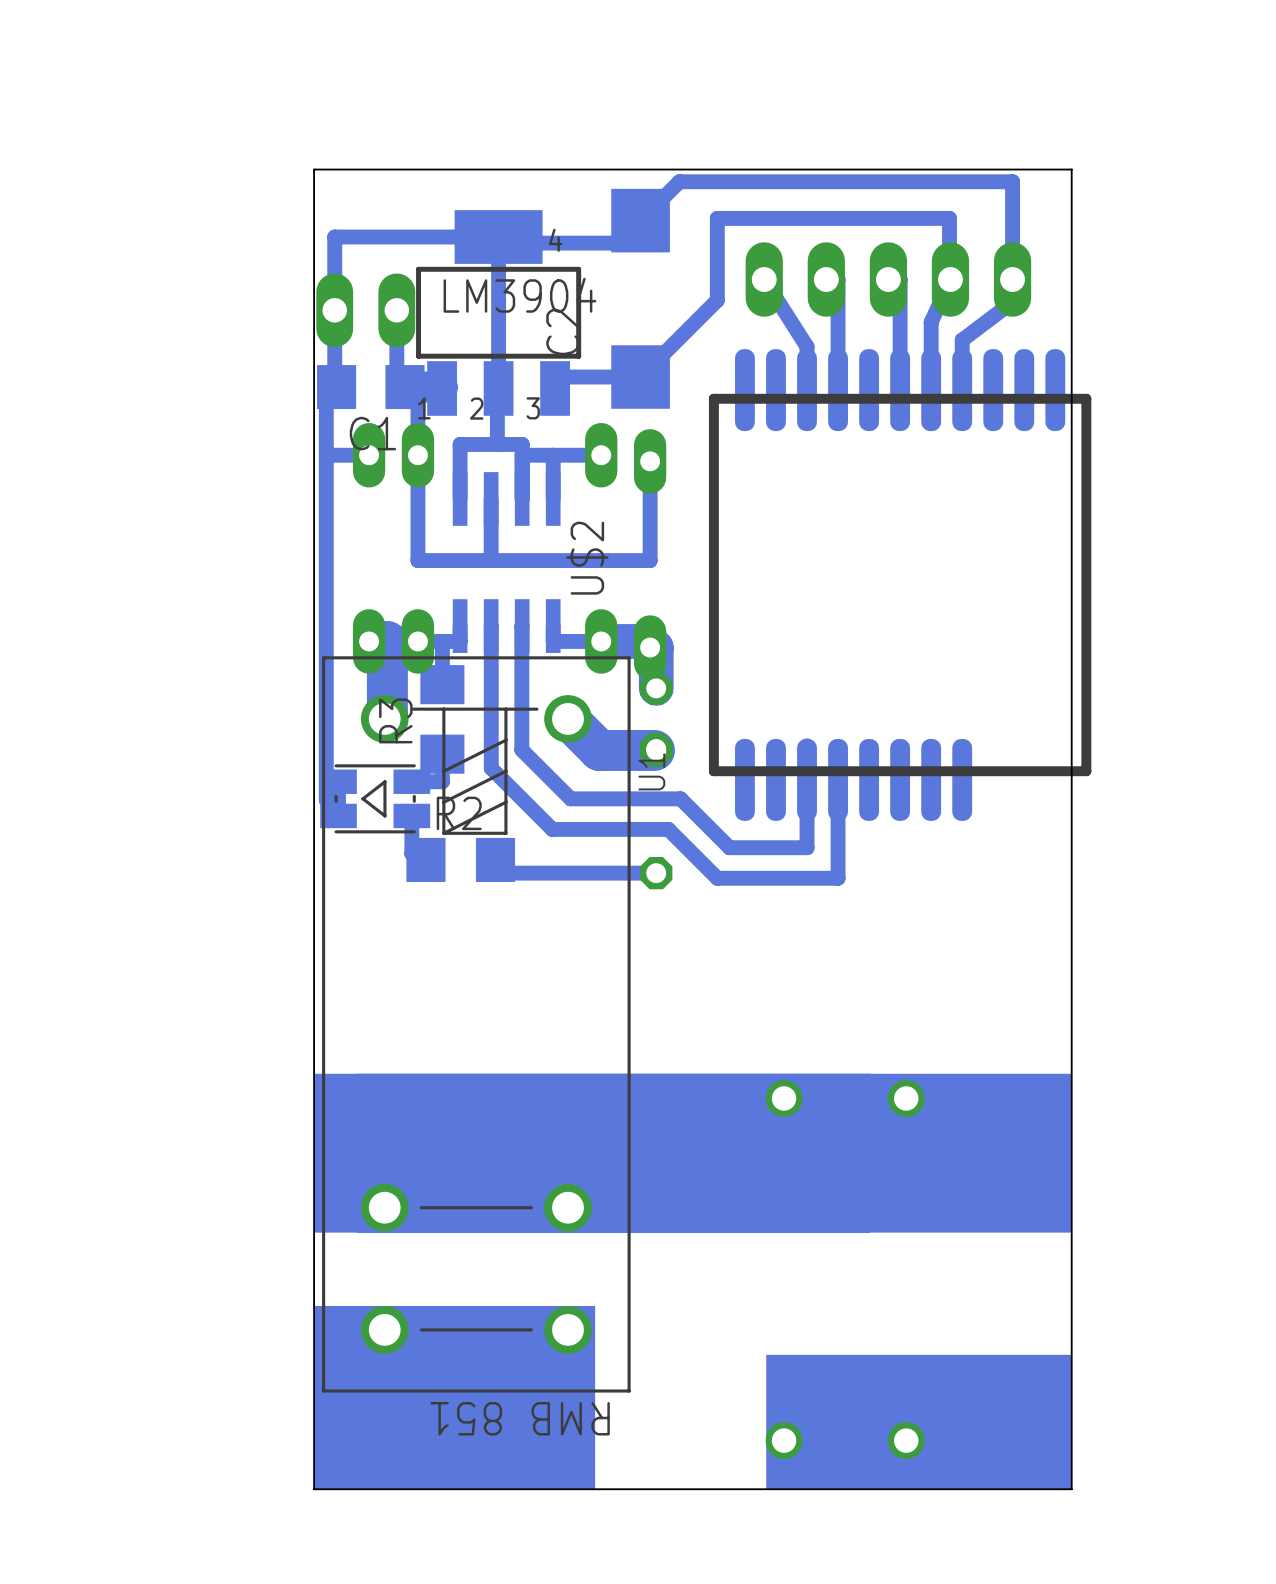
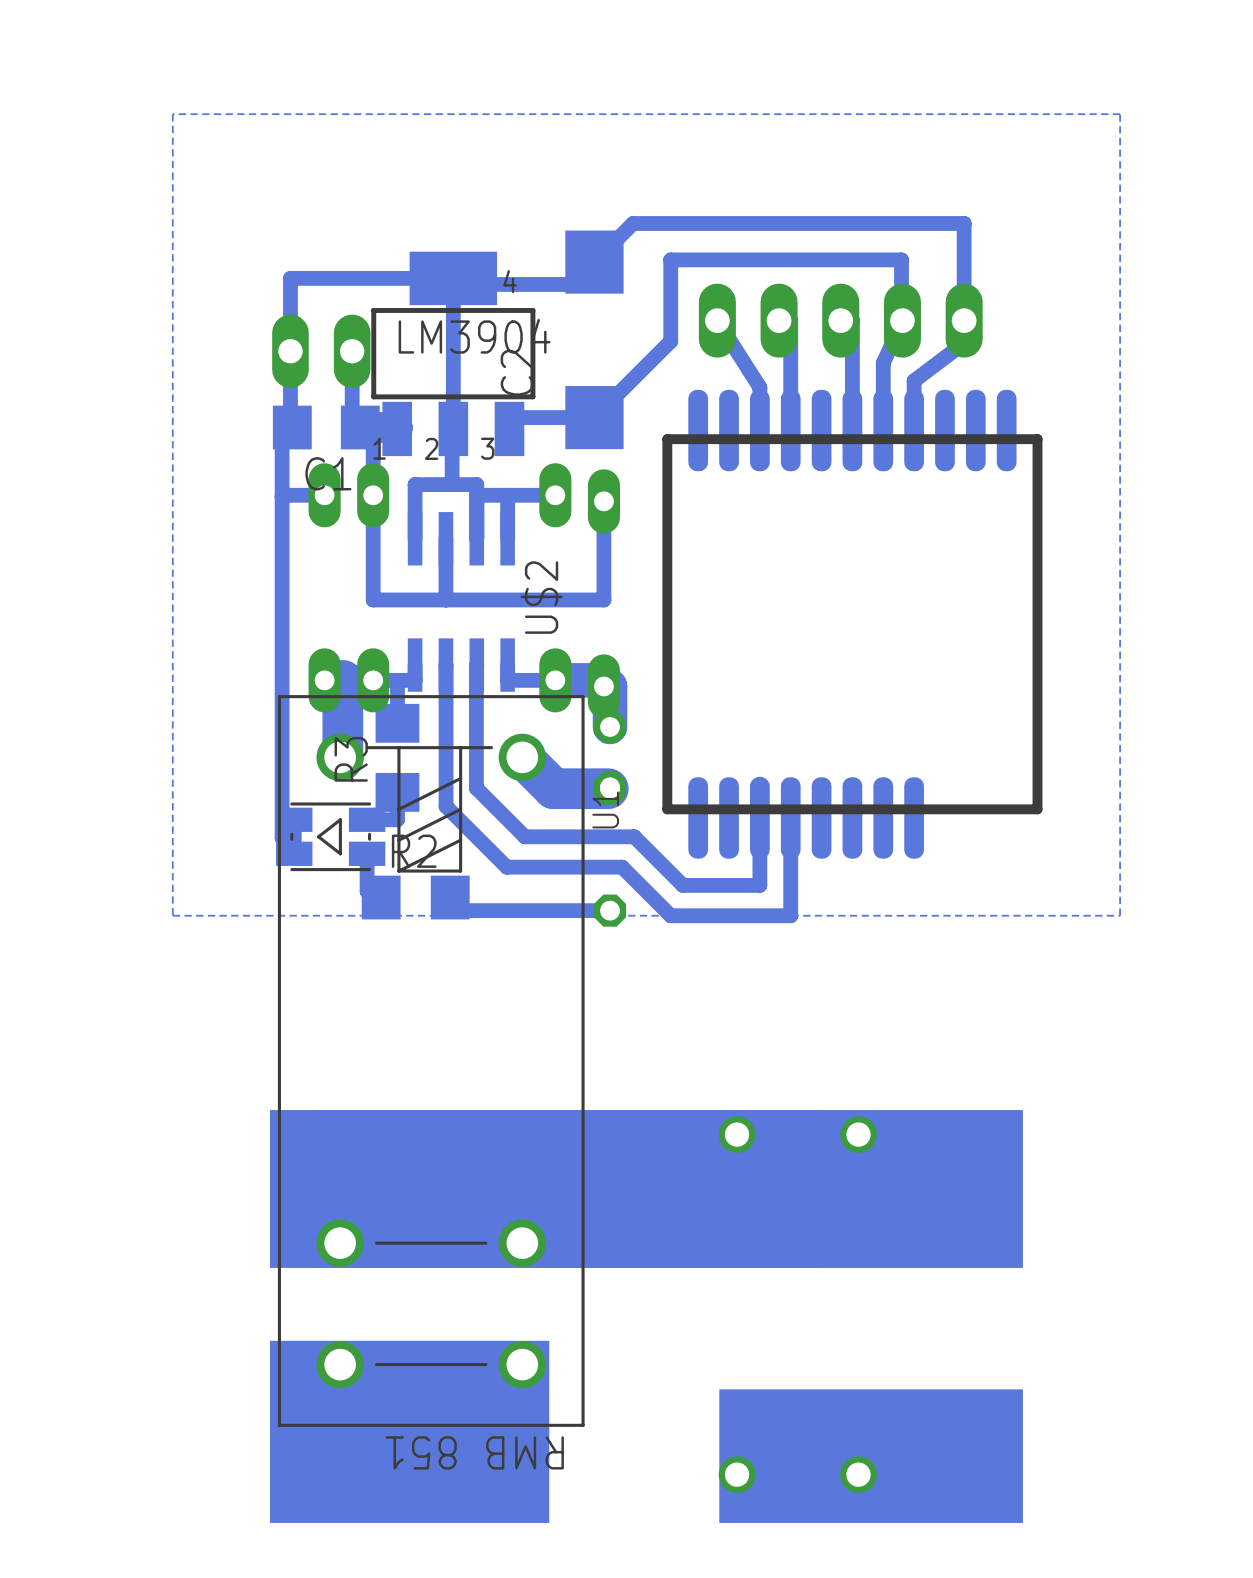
bottom zone outline: none -> (1120, 114) (172, 114) (172, 915) (1120, 915) (1120, 114)
board edge: (1071, 169) (314, 169) (314, 1489) (1071, 1489) (1071, 169) -> none

